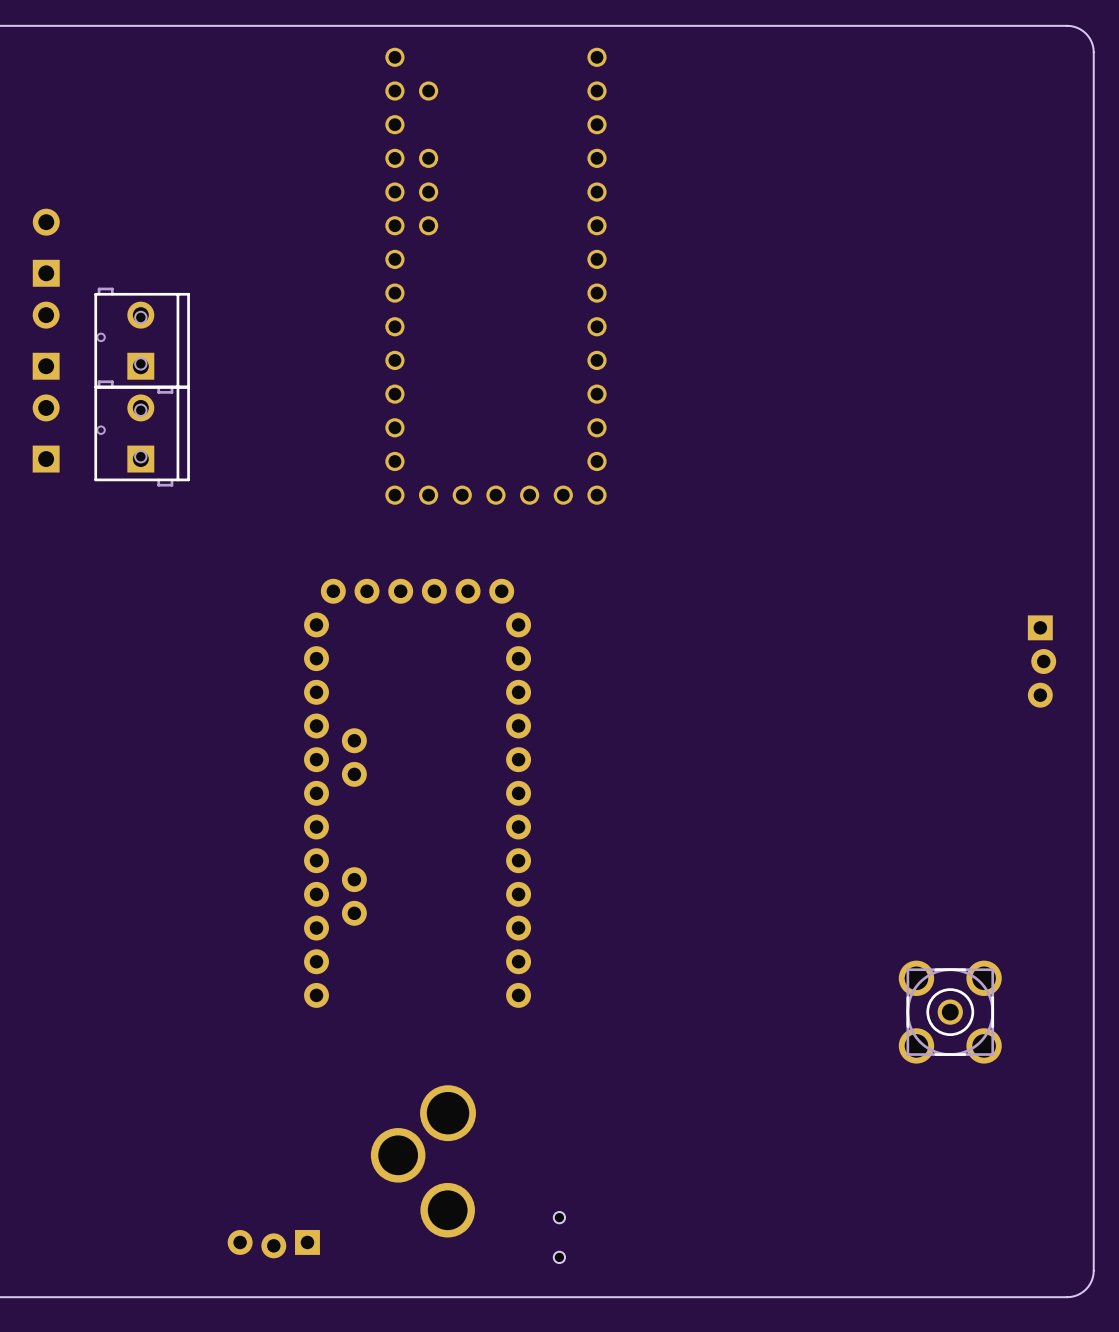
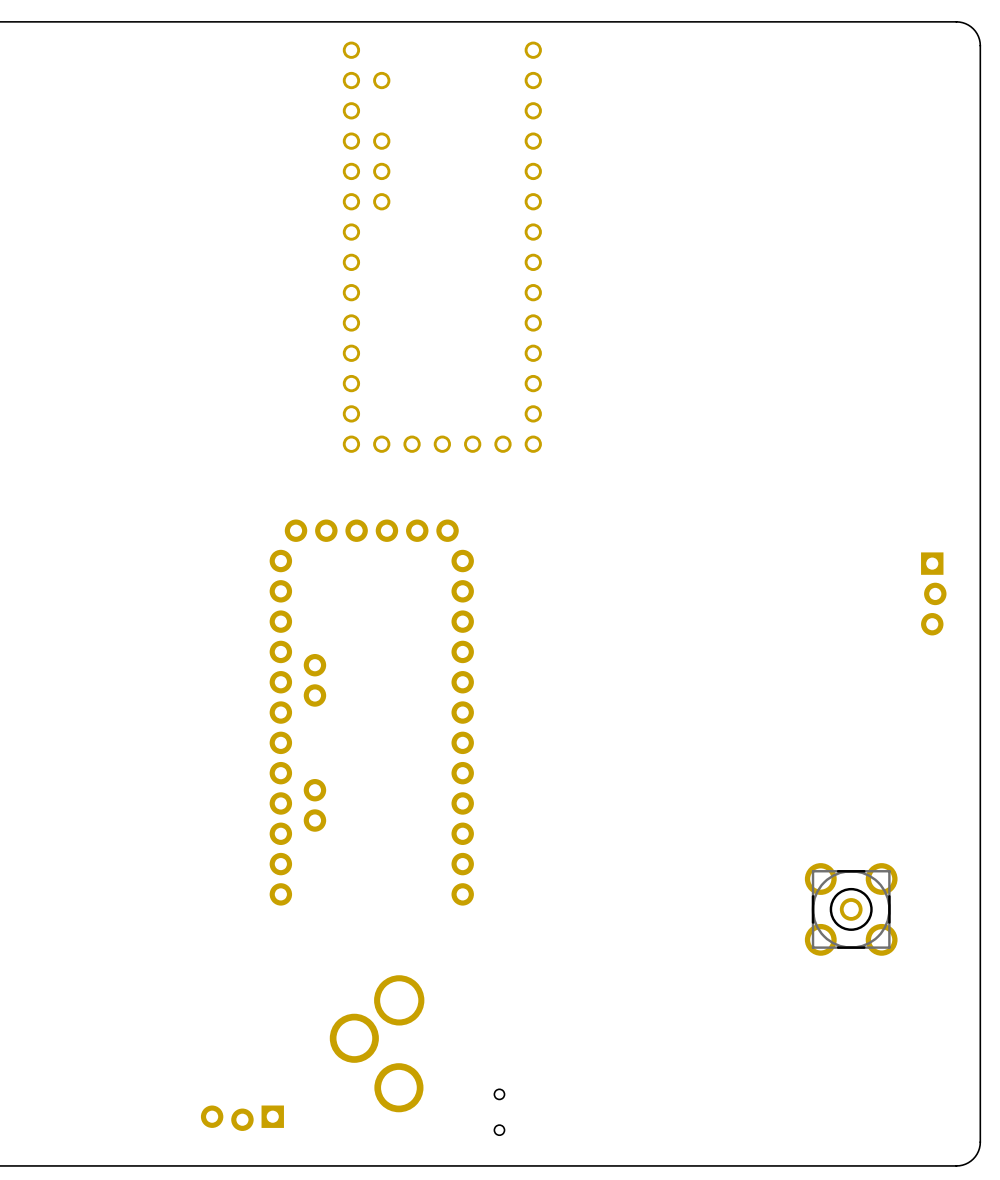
part: (46, 247) -> none
part: (46, 340) -> none
part: (142, 340) -> none
part: (46, 433) -> none
part: (142, 433) -> none

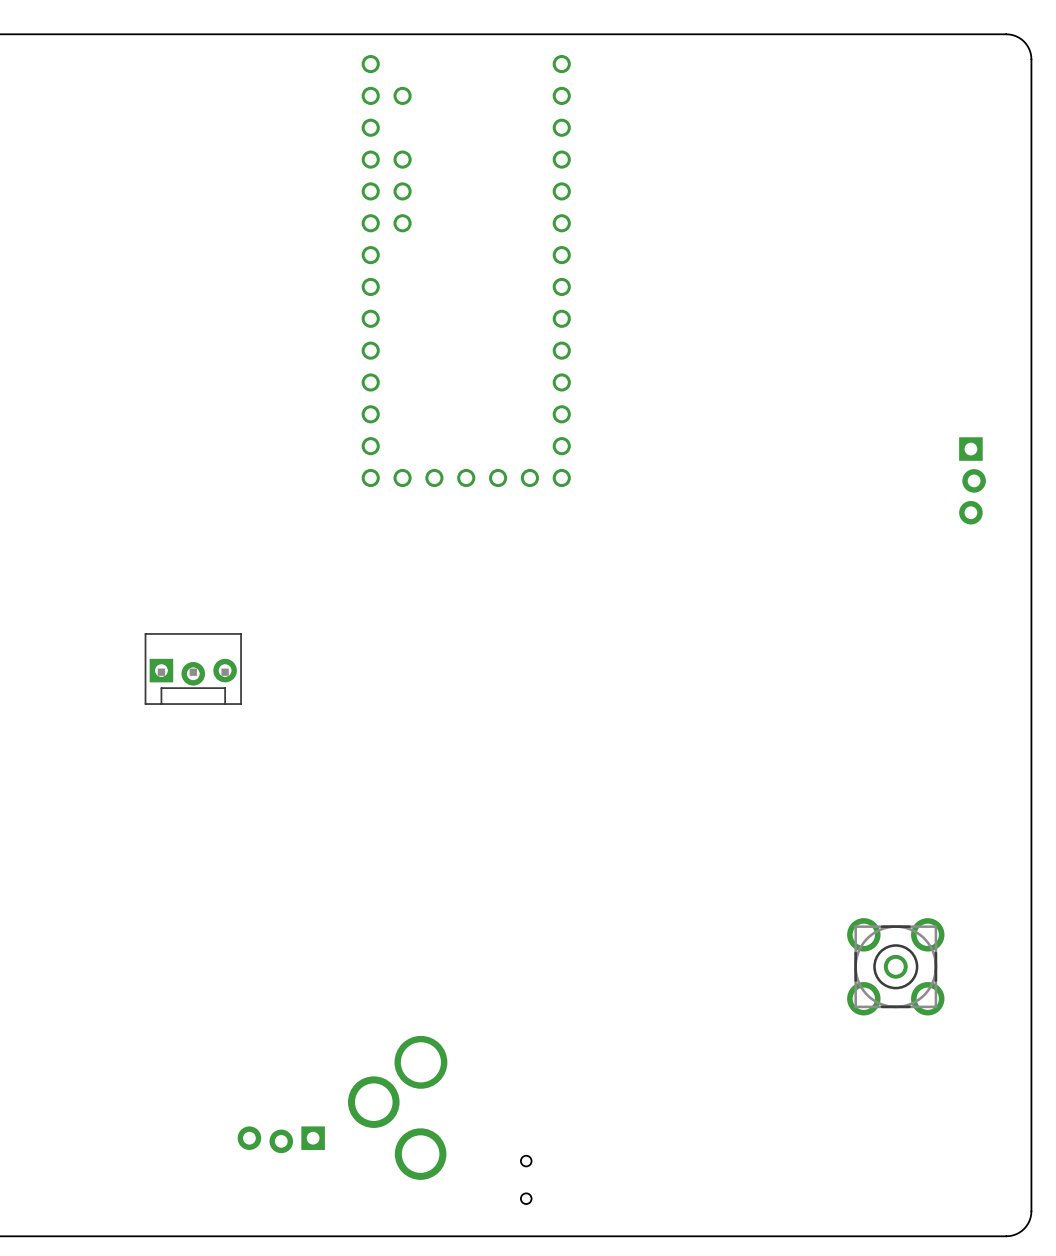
part position: (933, 593) -> (972, 480)
part: none -> (193, 669)
part: (371, 712) -> none
part position: (242, 1118) -> (281, 1139)

